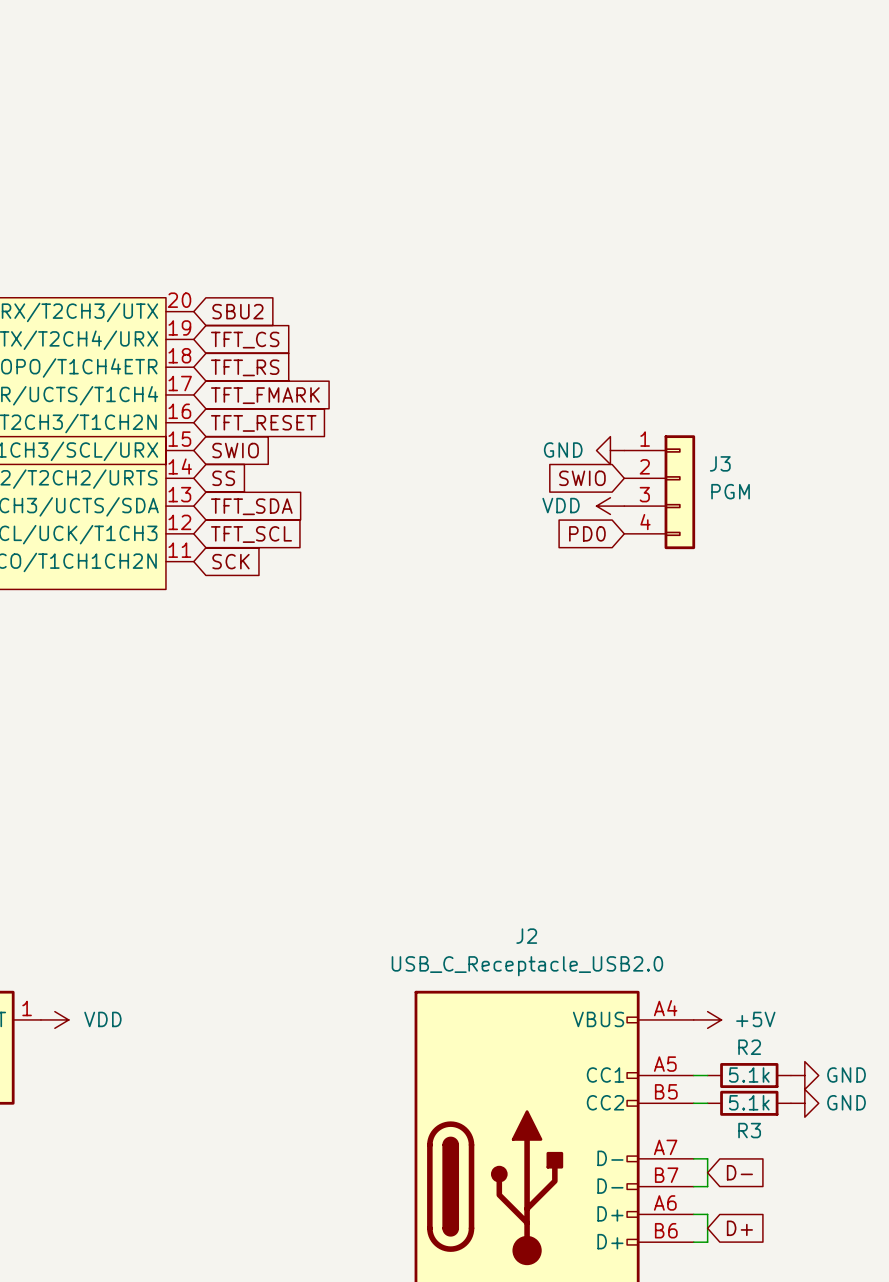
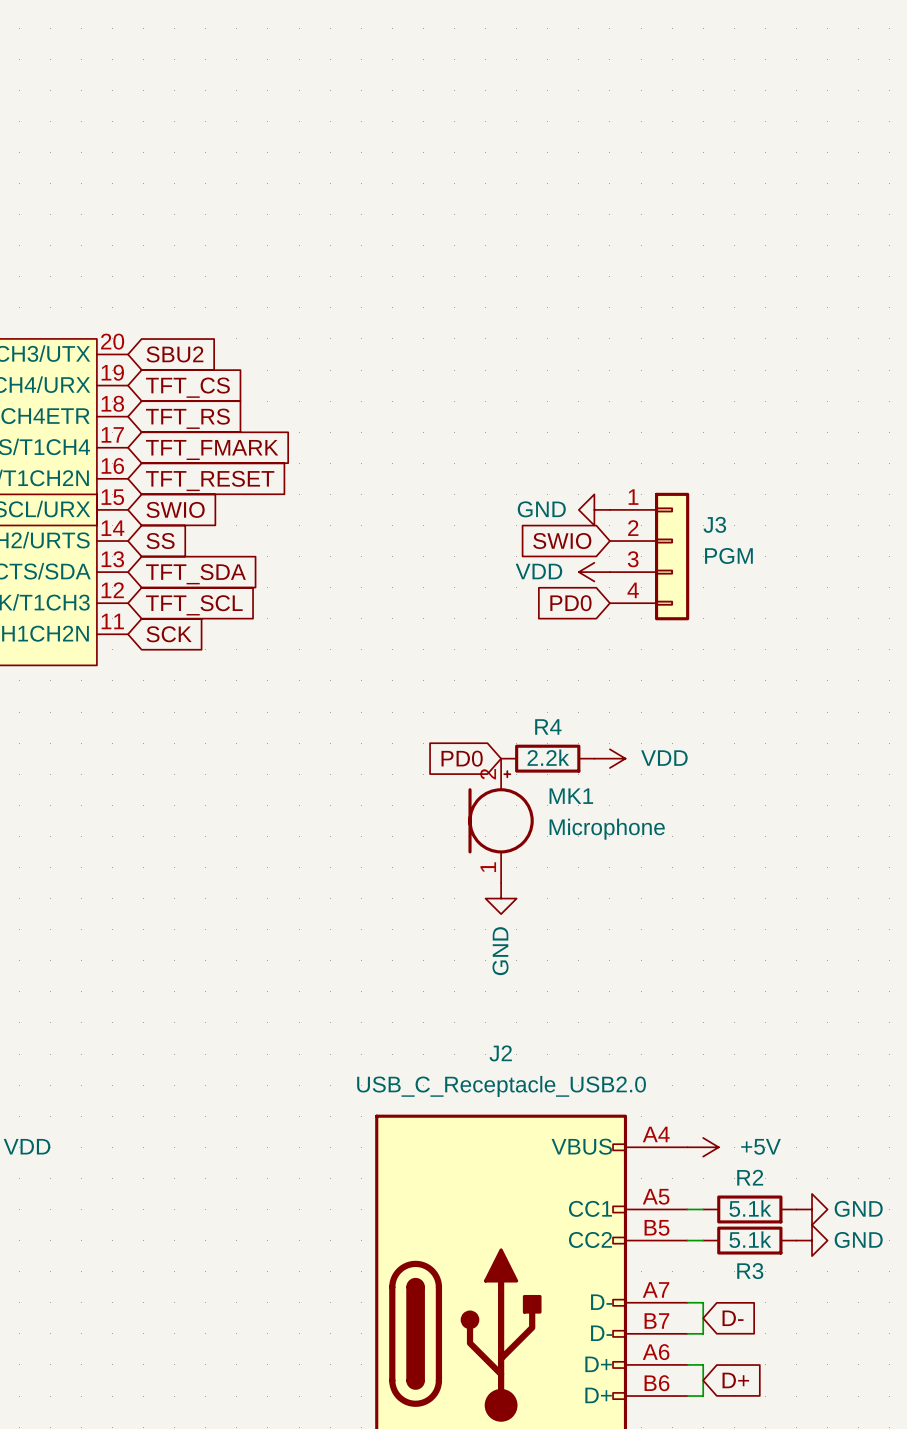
global label: none -> PD0 (462, 758)
R4: none -> 2.2k (547, 758)
power symbol: none -> VDD (609, 758)
MK1: none -> Microphone (501, 820)
power symbol: none -> GND (501, 898)

